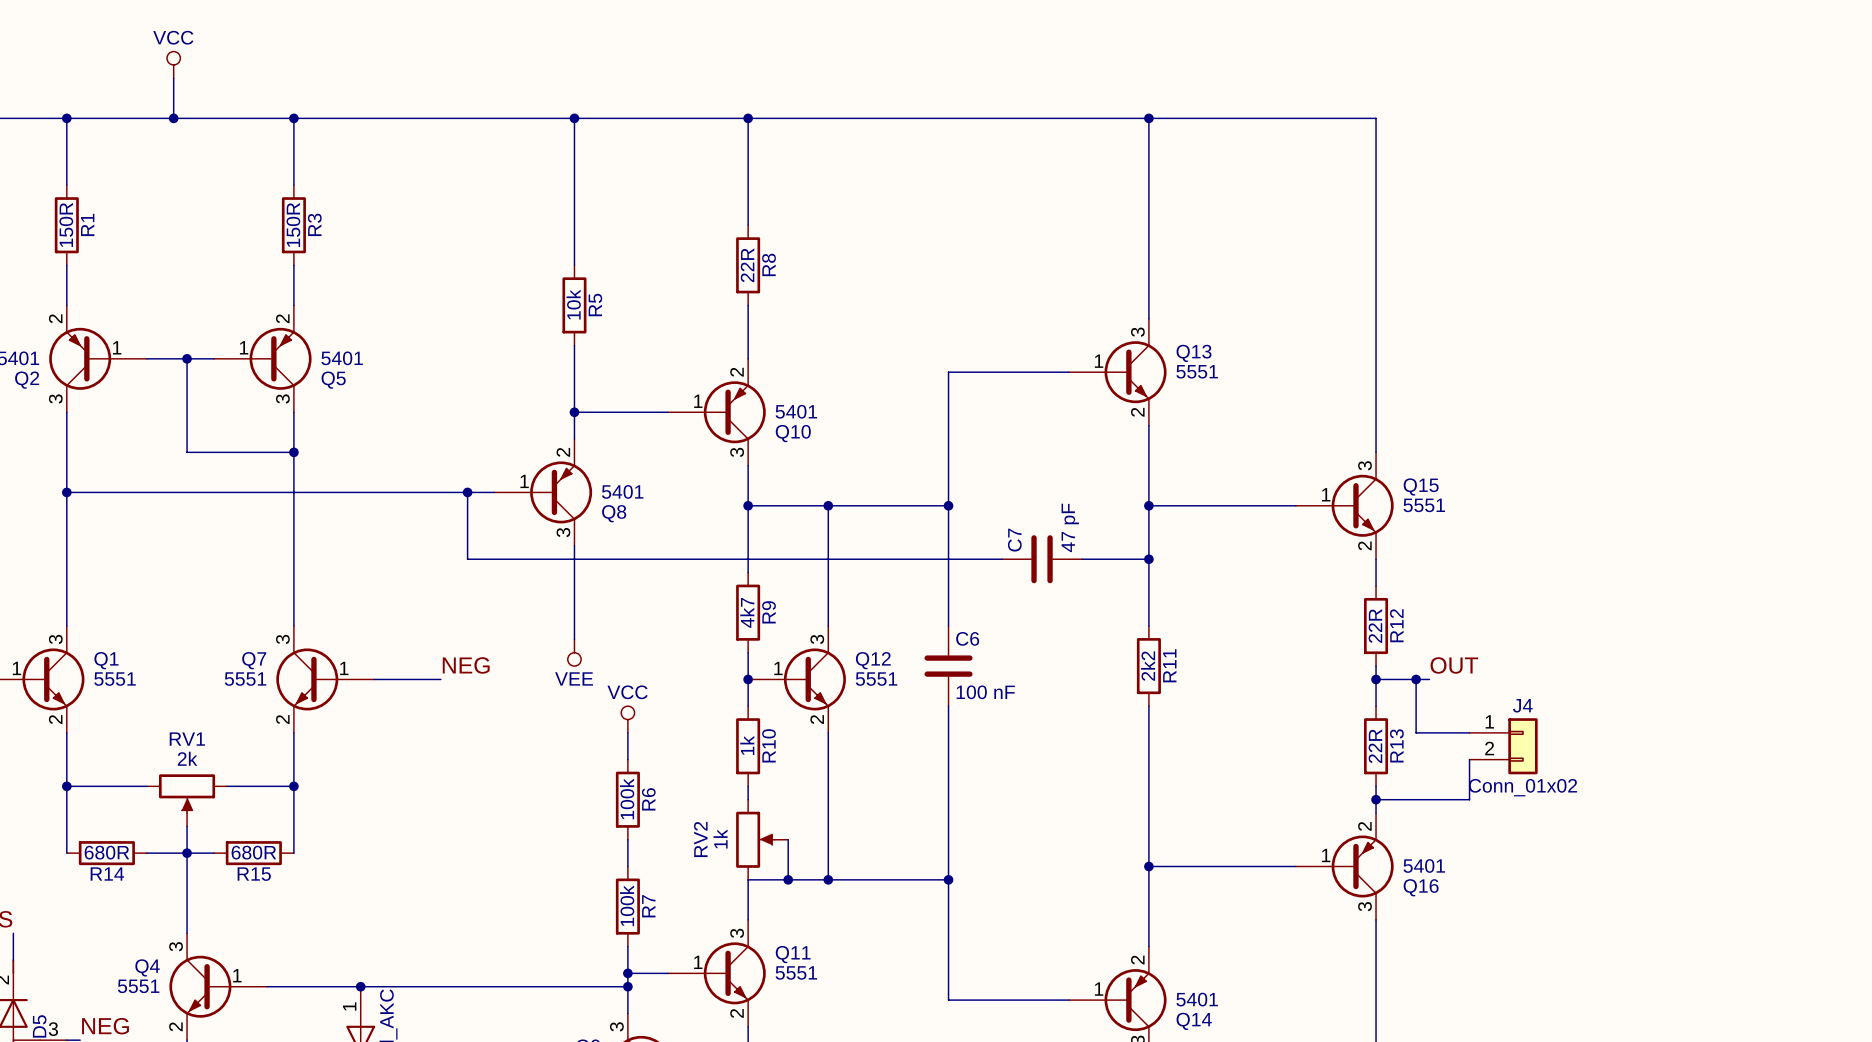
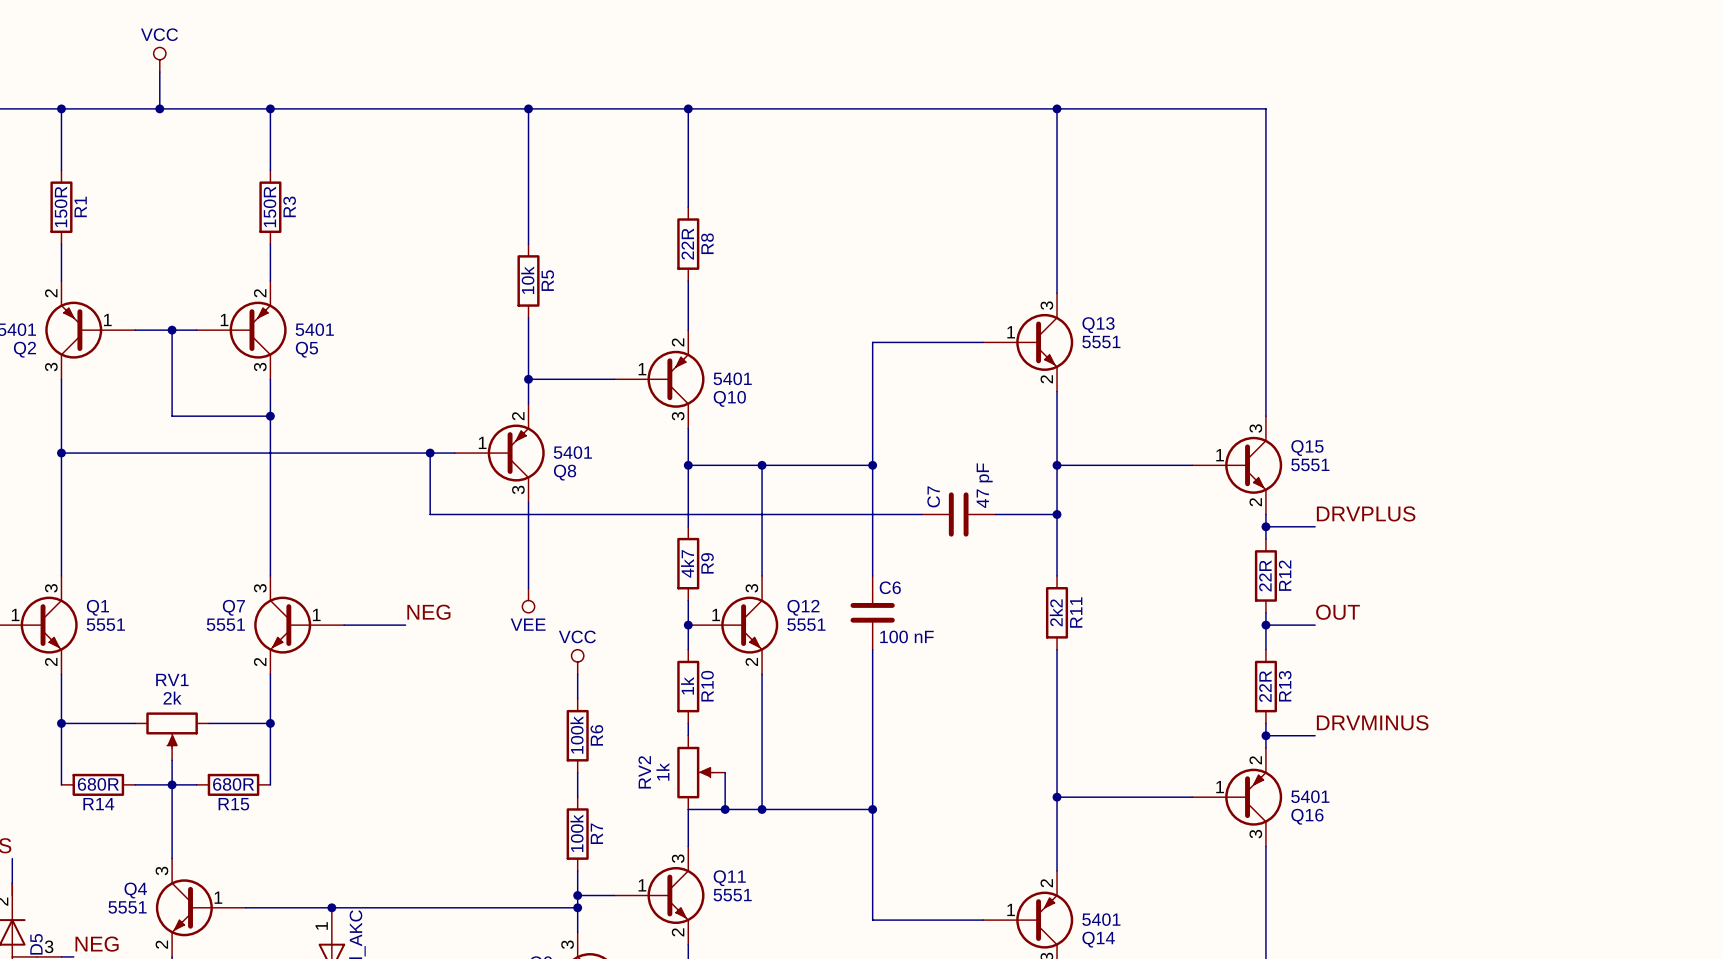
label: none -> DRVPLUS (1366, 513)
wire: none -> (1265, 526) (1315, 526)
junction: none -> (1265, 526)
wire: (1416, 679) (1416, 732) (1469, 732) -> none
junction: (1416, 679) -> none
J4: Conn_01x02 (1503, 746) -> none
wire: (1469, 759) (1469, 799) (1429, 799) -> none
label: none -> DRVMINUS (1372, 722)

